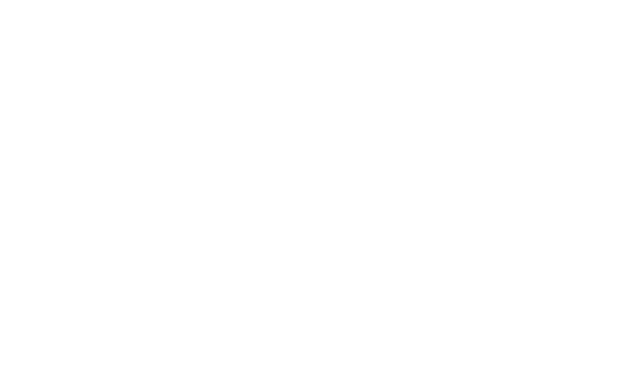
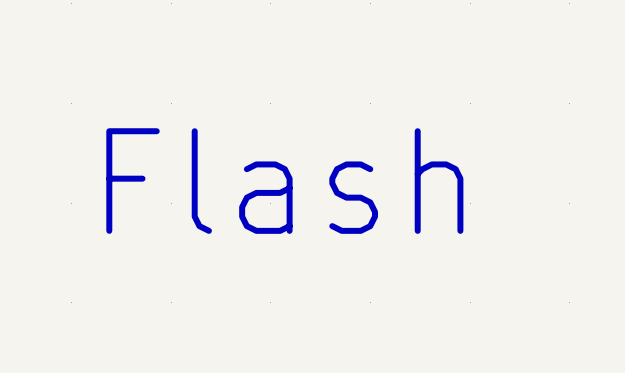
text: none -> Flash (284, 181)

